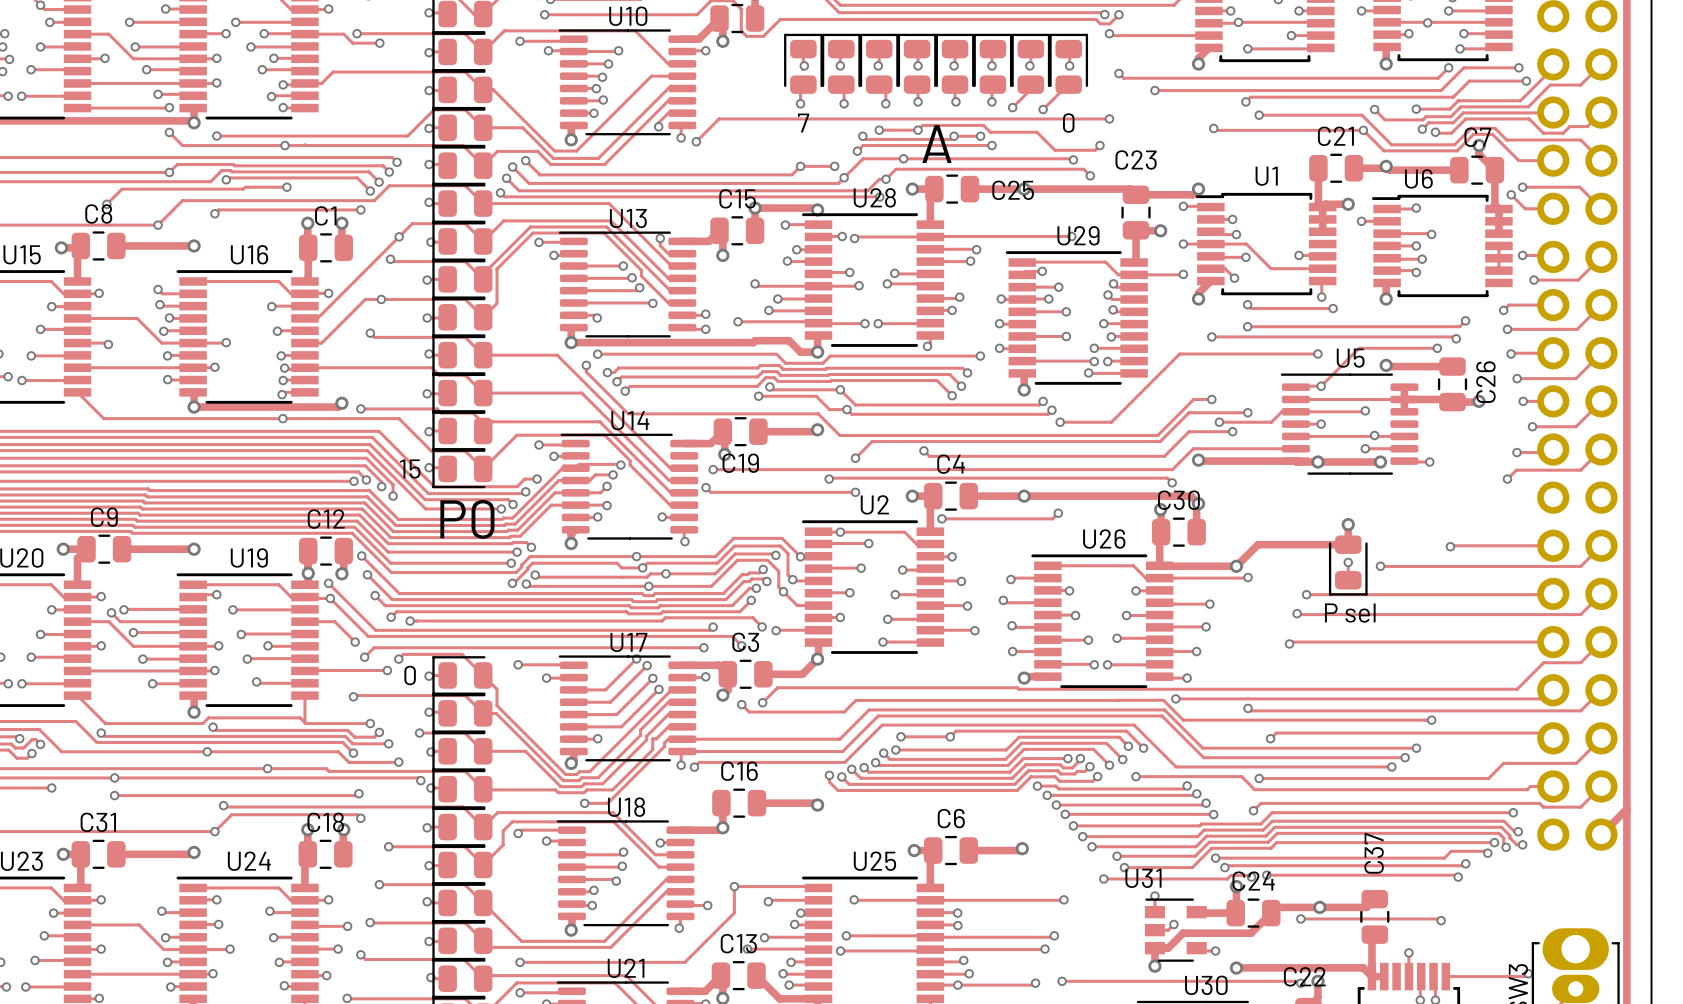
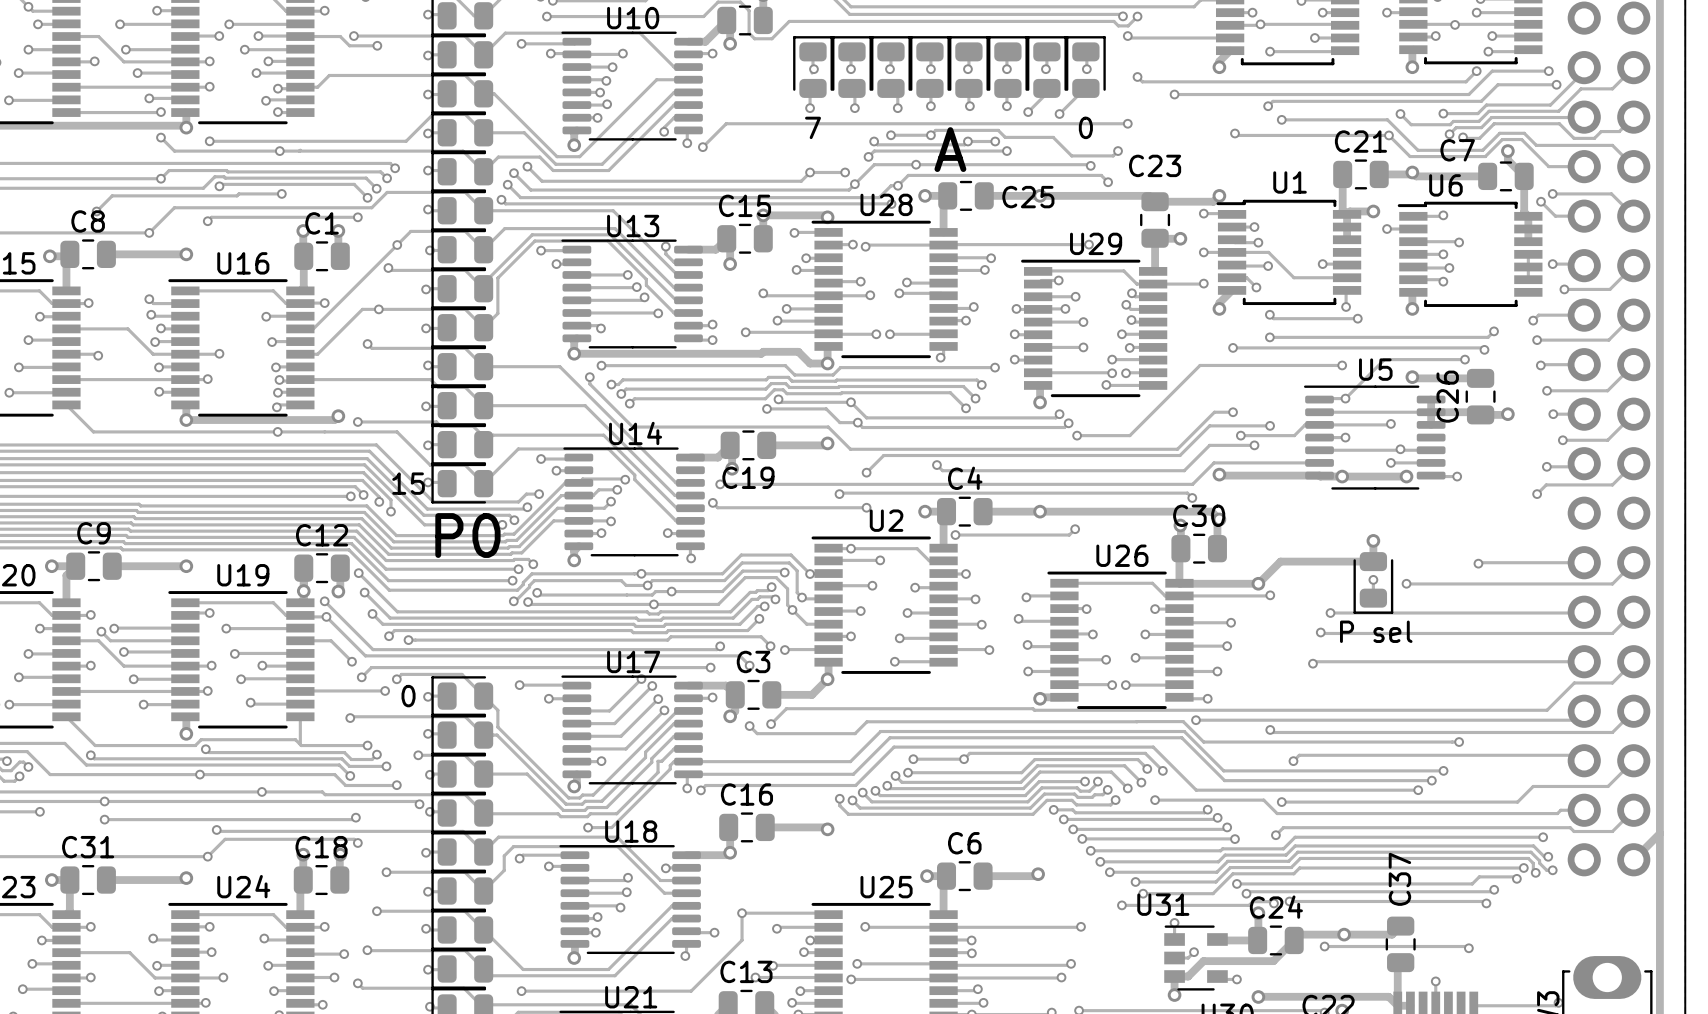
C7 name position: C7 (1477, 137) -> C7 (1457, 150)
C26 name position: C26 (1485, 382) -> C26 (1447, 396)

